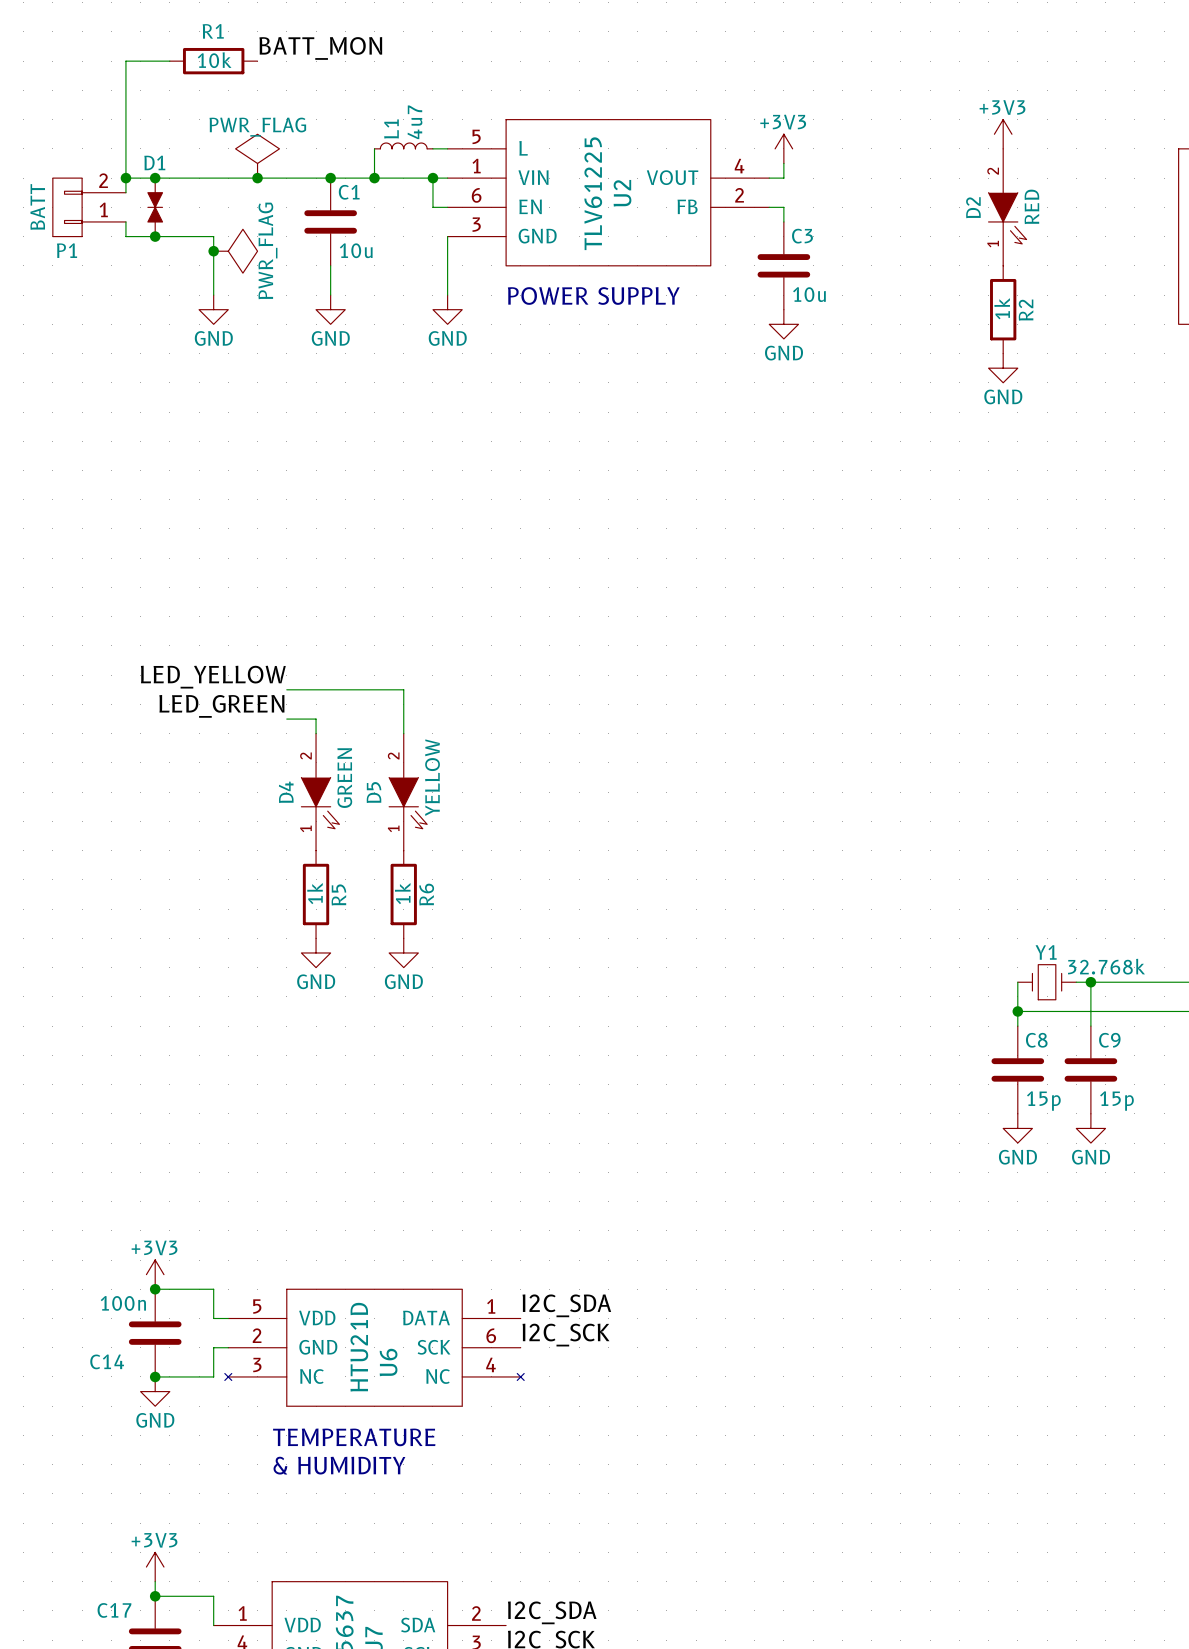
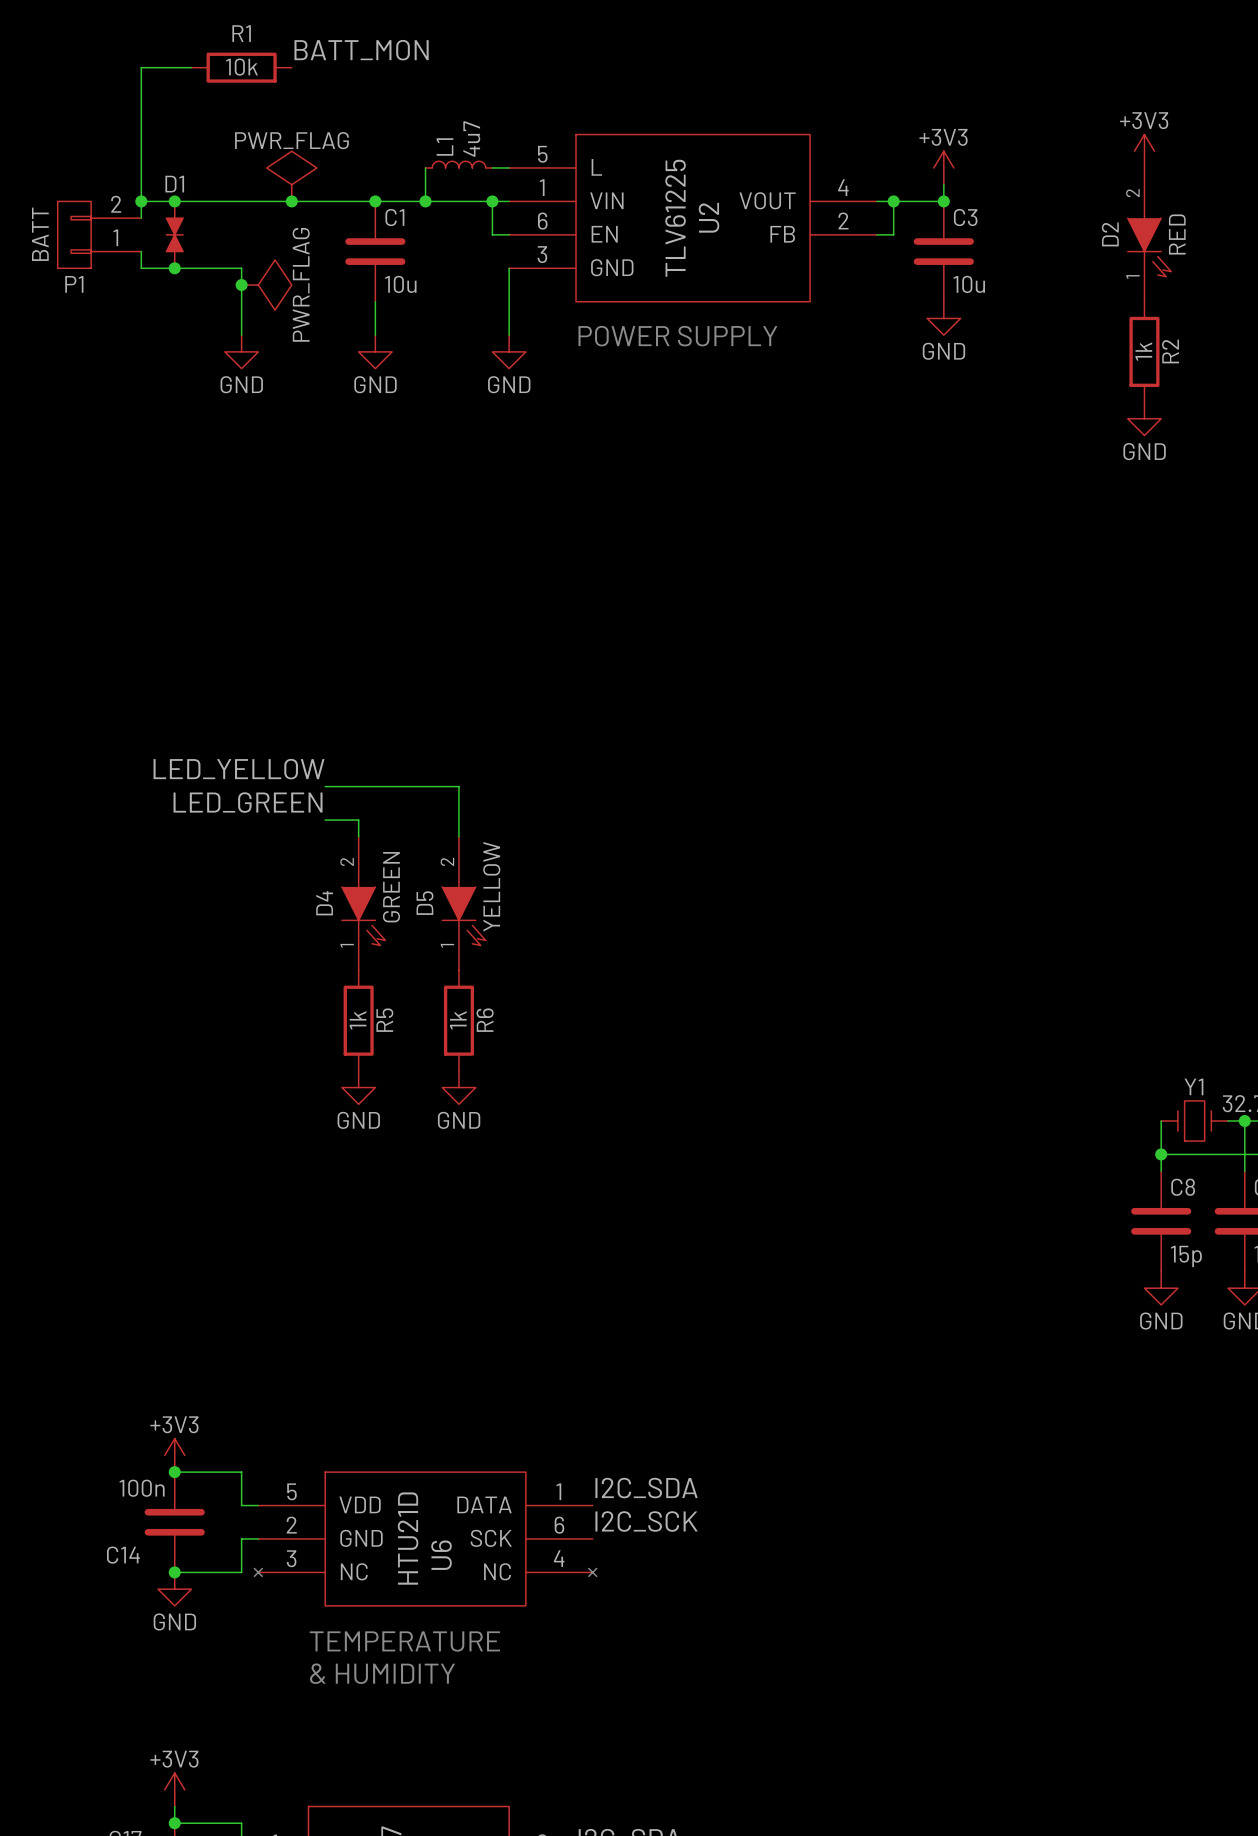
power symbol position: +3V3 (783, 148) -> +3V3 (943, 167)
wire: (783, 163) (783, 178) -> none
junction: none -> (893, 201)
junction: none -> (943, 201)
wire: (783, 207) (783, 221) -> (893, 234) (893, 201) (943, 201) (943, 184)
C3 position: (783, 265) -> (943, 251)
power symbol position: GND (783, 324) -> GND (943, 318)

